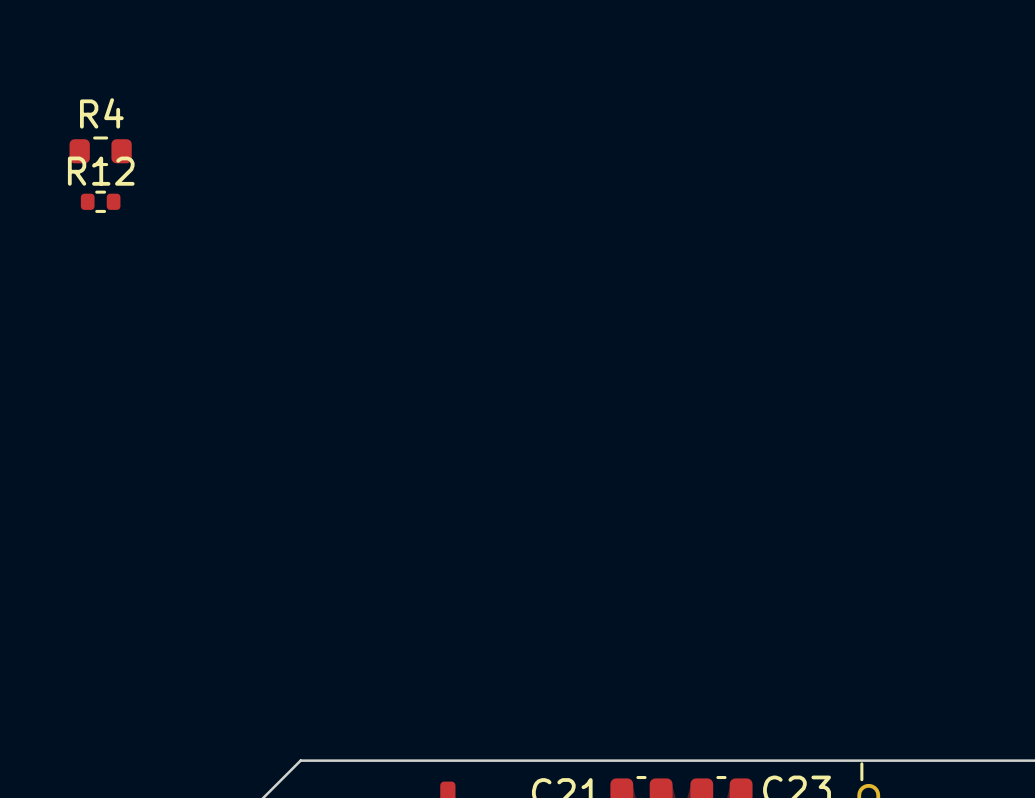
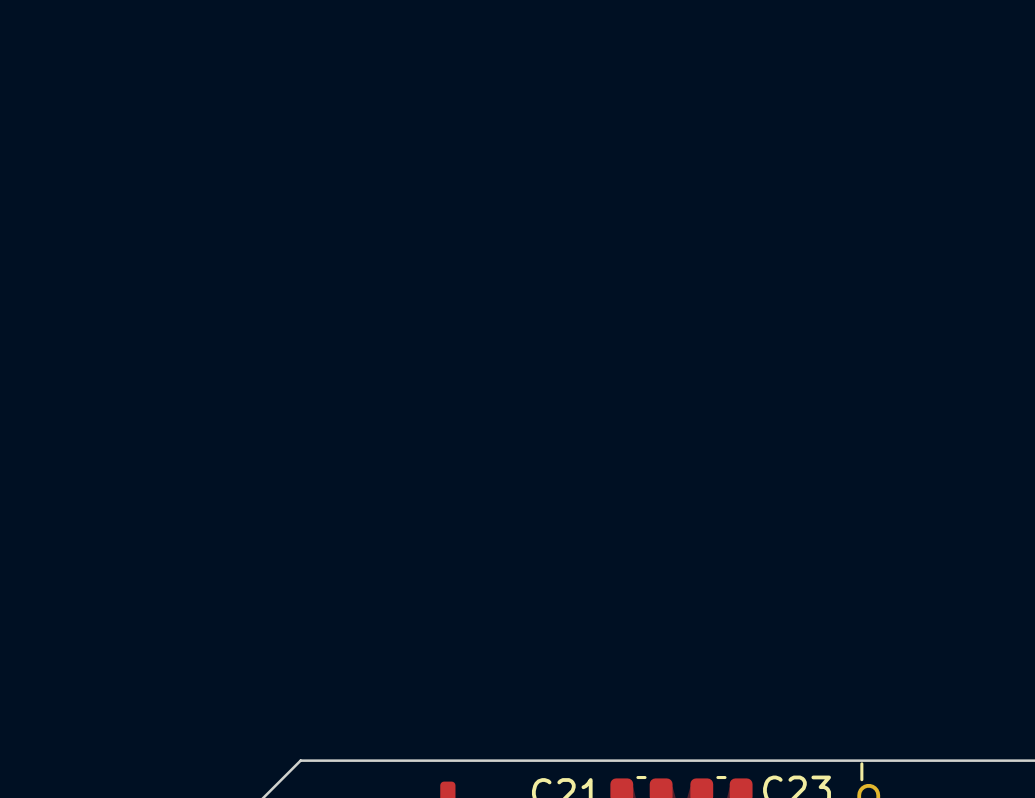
R4: (100, 151) -> none
R12: (100, 201) -> none

